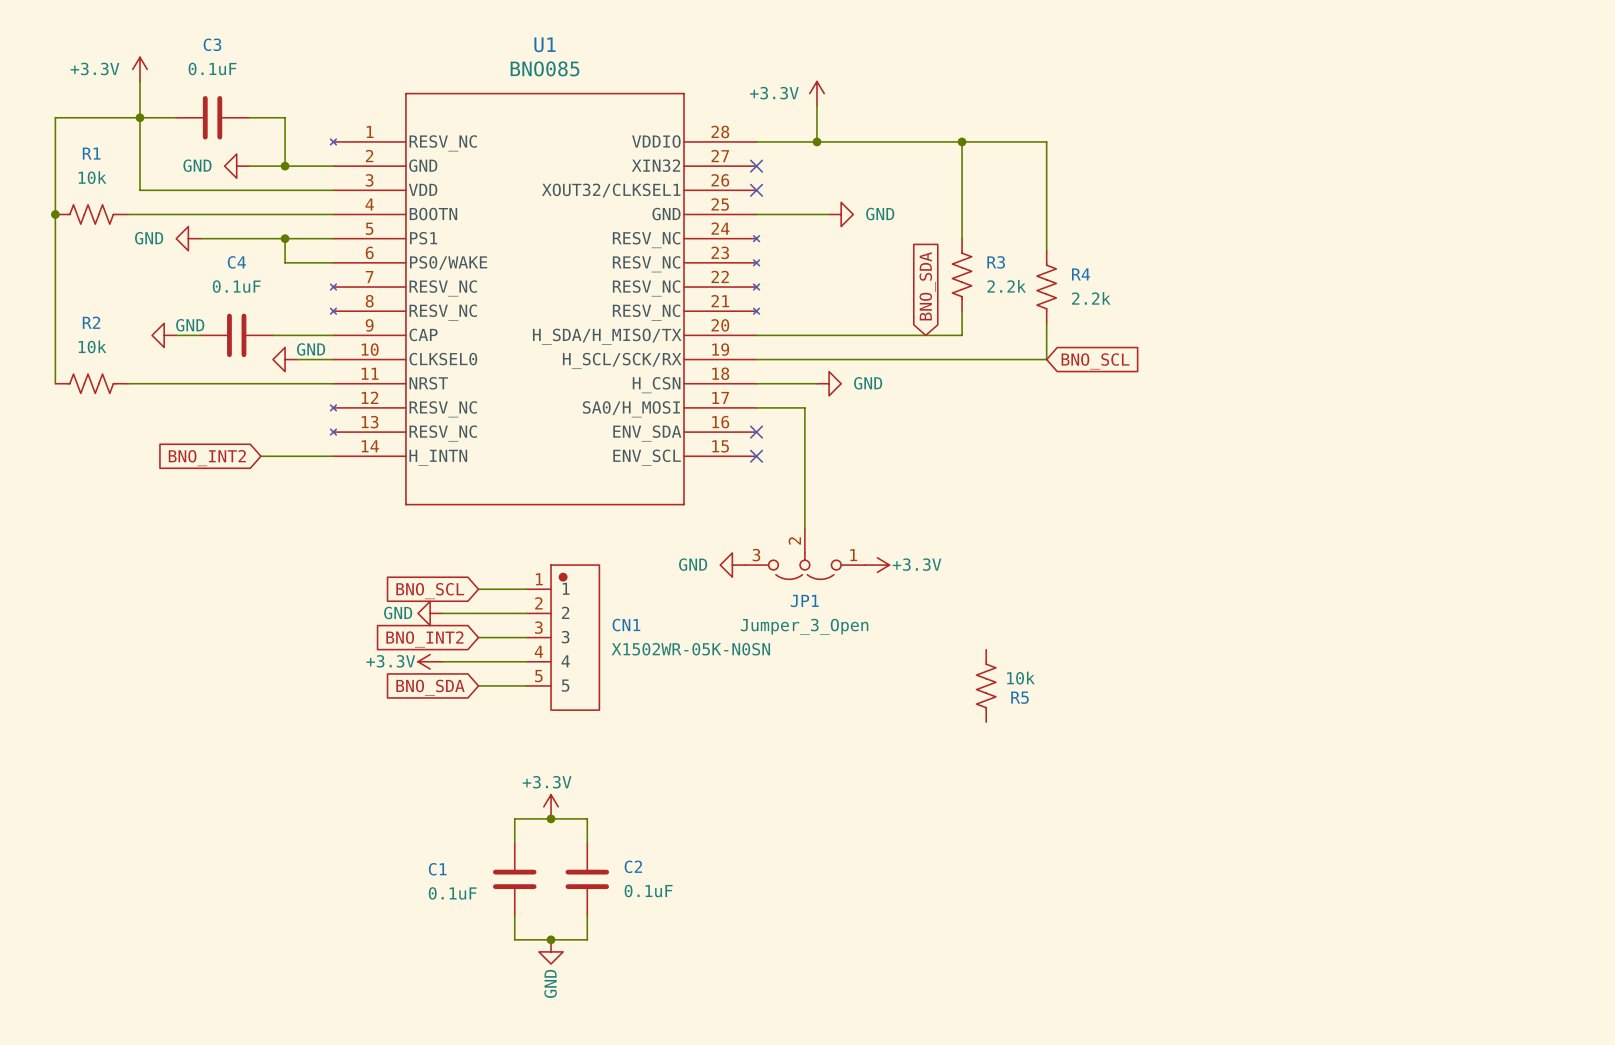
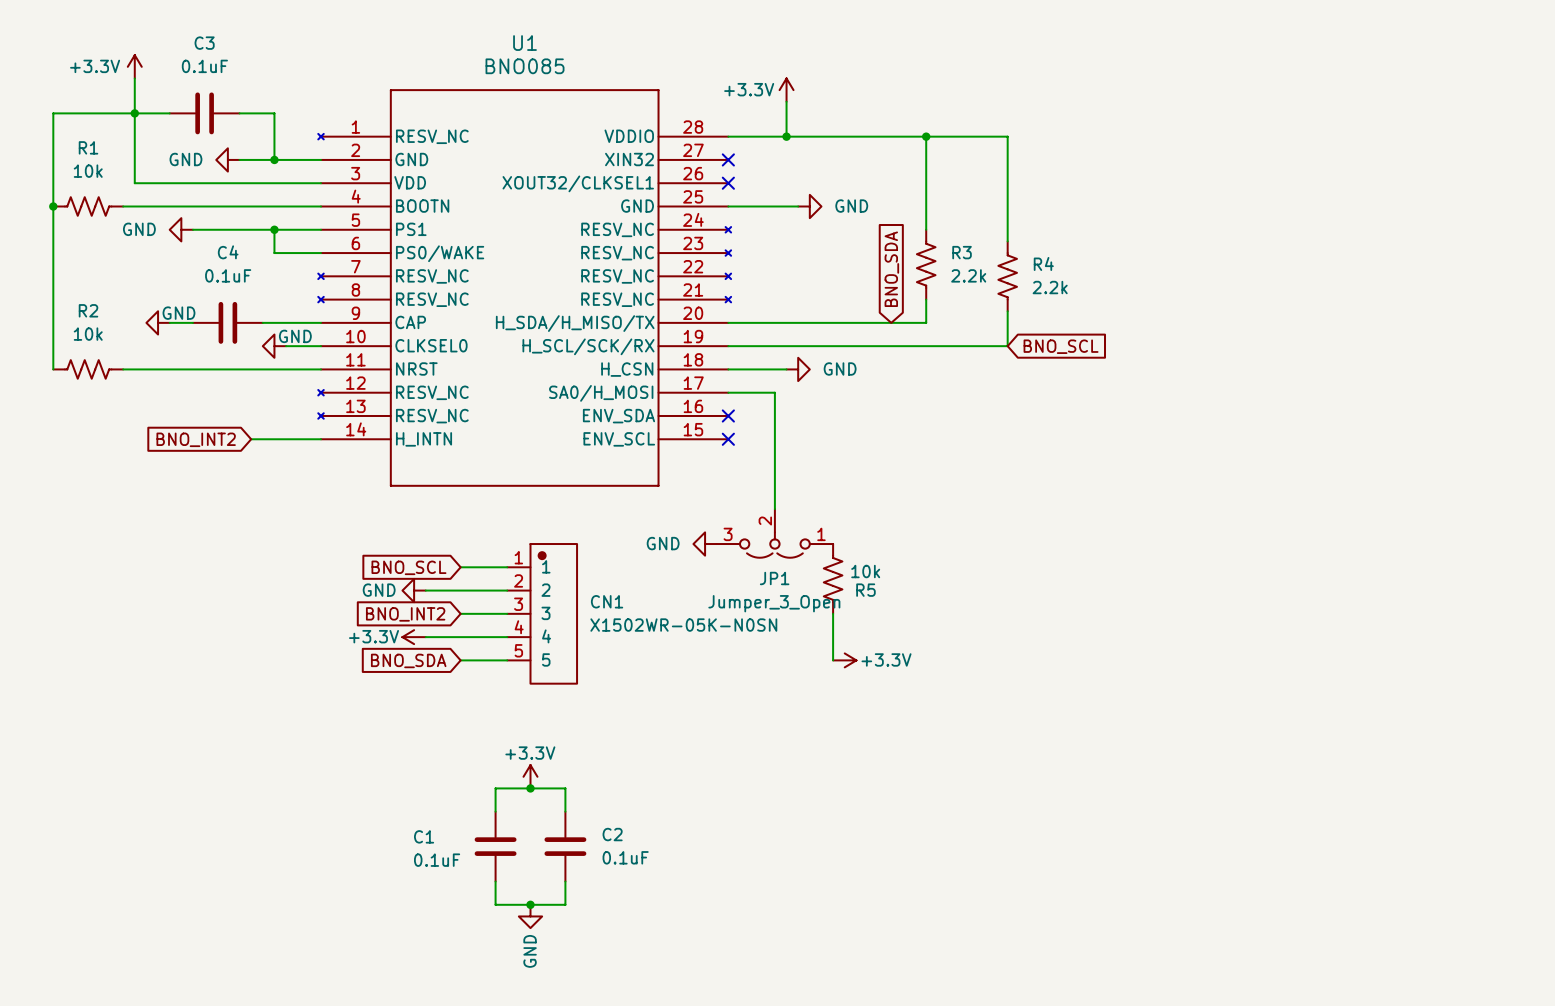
power symbol position: +3.3V (877, 565) -> +3.3V (844, 660)
wire: none -> (833, 613) (833, 660)
R5 position: (986, 685) -> (833, 578)

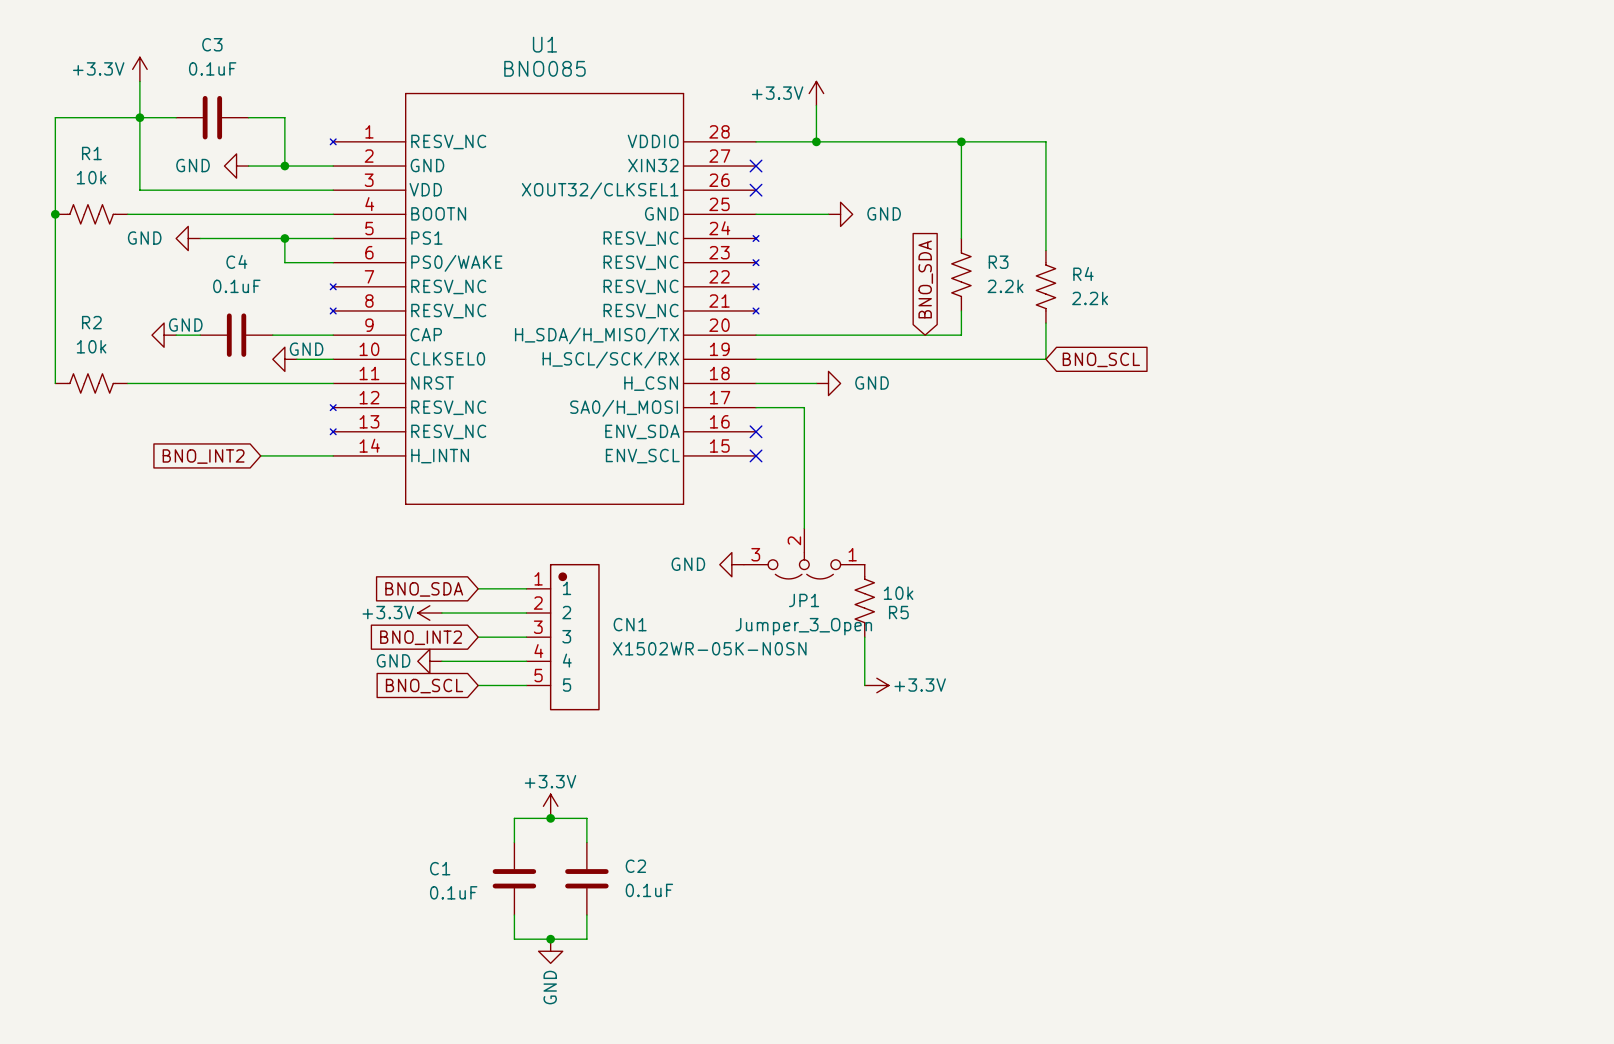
global label: BNO_SCL (408, 567) -> BNO_SDA (424, 589)
power symbol: GND (414, 590) -> +3.3V (429, 613)
power symbol: +3.3V (414, 637) -> GND (429, 661)
global label: BNO_SDA (408, 660) -> BNO_SCL (424, 686)

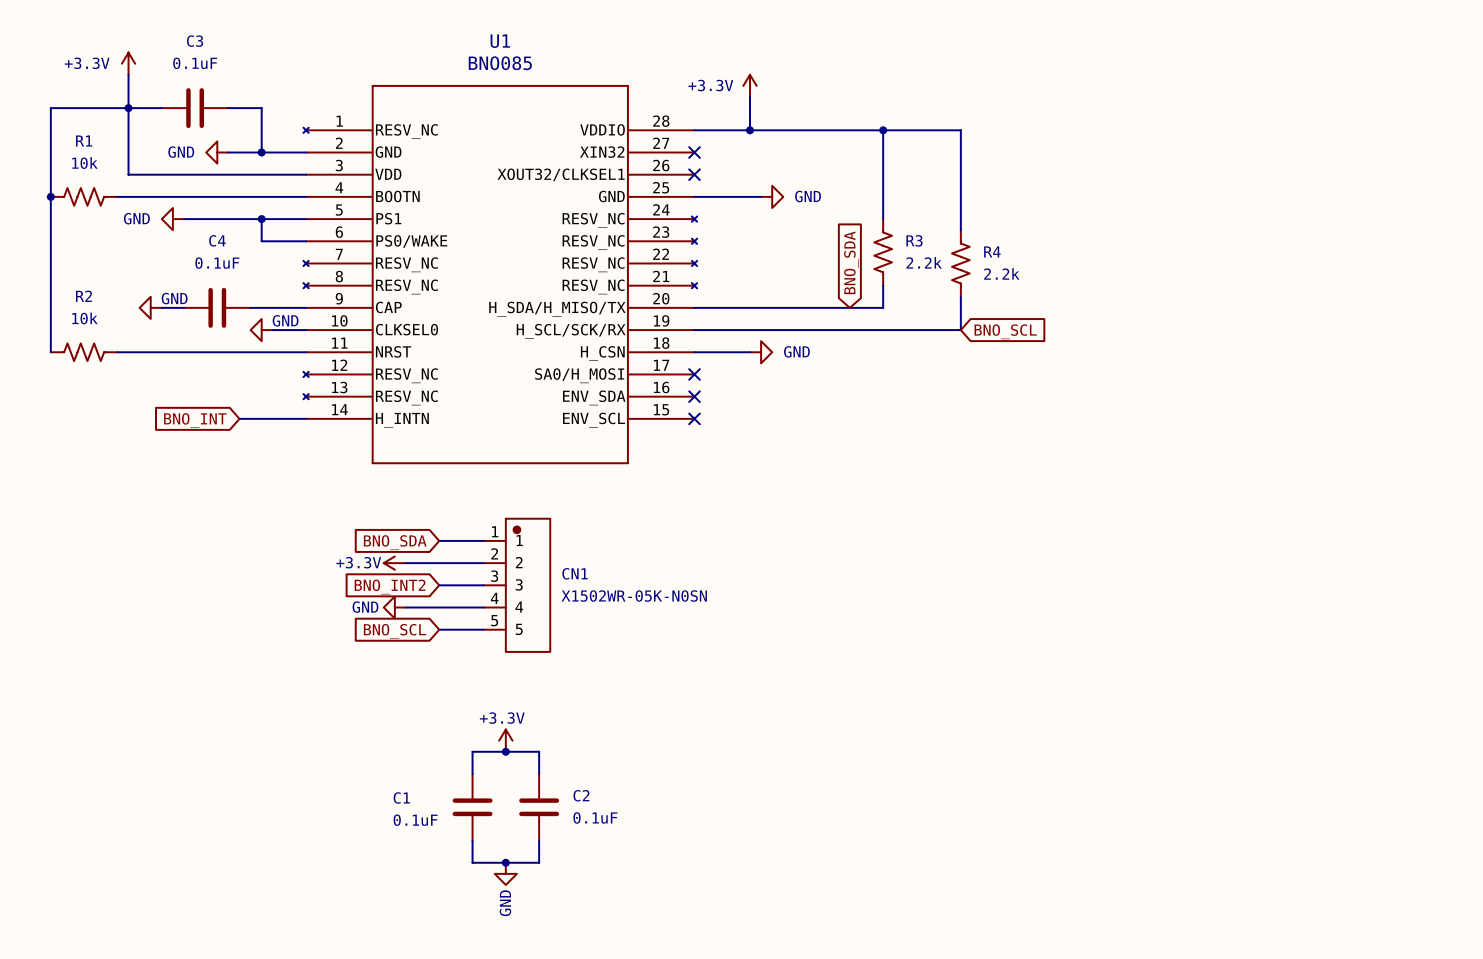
wire: (756, 407) (804, 407) (804, 528) -> none
no-connect mark: none -> (694, 374)
global label: BNO_INT2 (203, 456) -> BNO_INT (195, 420)
JP1: Jumper_3_Open (804, 553) -> none
power symbol: GND (731, 564) -> none
R5: 10k (864, 600) -> none
wire: (864, 637) (864, 685) -> none
power symbol: +3.3V (876, 685) -> none

